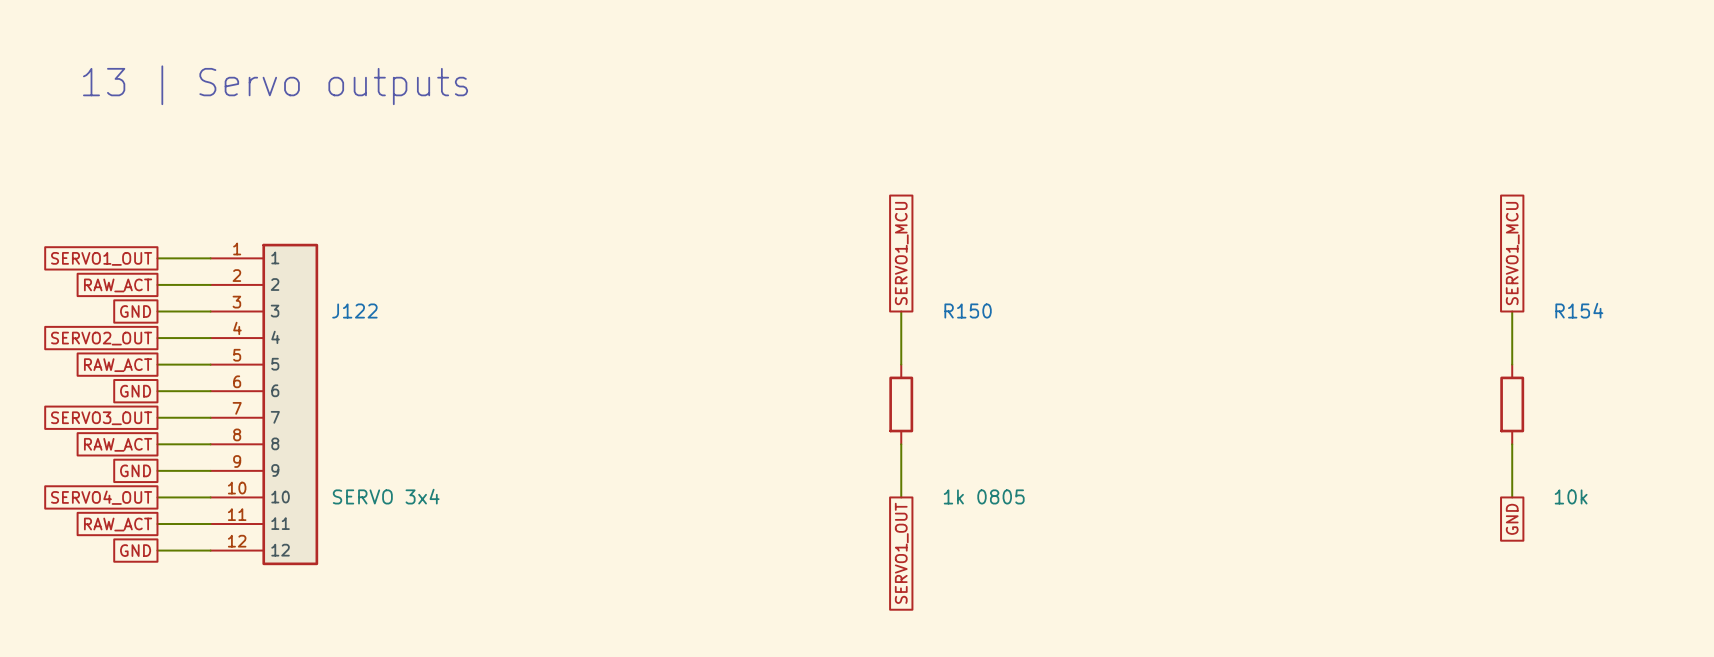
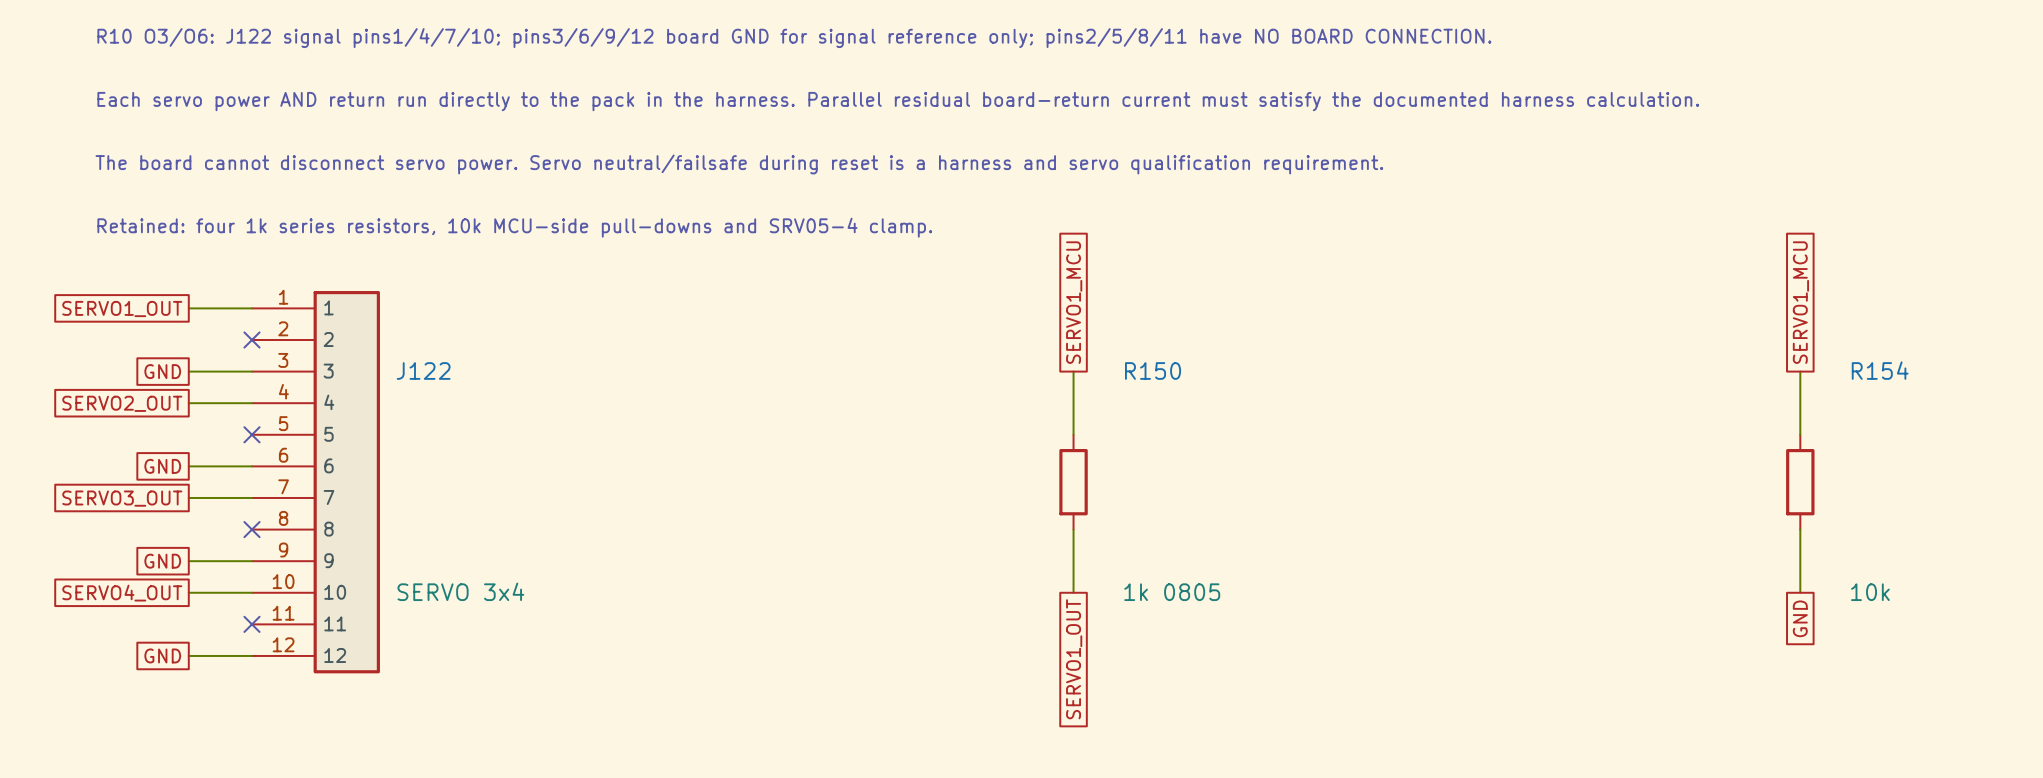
text: none -> R10 O3/O6: J122 signal pins1/4/7/10; pins3/6/9/12 board GND for signal reference only; pins2/5/8/11 have NO BOARD CONNECTION. (794, 38)
text: 13 | Servo outputs (275, 85) -> Each servo power AND return run directly to the pack in the harness. Parallel residual board-return current must satisfy the documented harness calculation. (898, 101)
text: none -> The board cannot disconnect servo power. Servo neutral/failsafe during reset is a harness and servo qualification requirement. (739, 164)
text: none -> Retained: four 1k series resistors, 10k MCU-side pull-downs and SRV05-4 clamp. (514, 227)
wire: (157, 284) (210, 284) -> none
no-connect mark: none -> (251, 339)
global label: RAW_ACT (118, 285) -> none
wire: (157, 364) (210, 364) -> none
no-connect mark: none -> (251, 434)
global label: RAW_ACT (118, 365) -> none
global label: RAW_ACT (118, 444) -> none
wire: (157, 444) (210, 444) -> none
no-connect mark: none -> (251, 529)
global label: RAW_ACT (118, 524) -> none
wire: (157, 524) (210, 524) -> none
no-connect mark: none -> (251, 624)

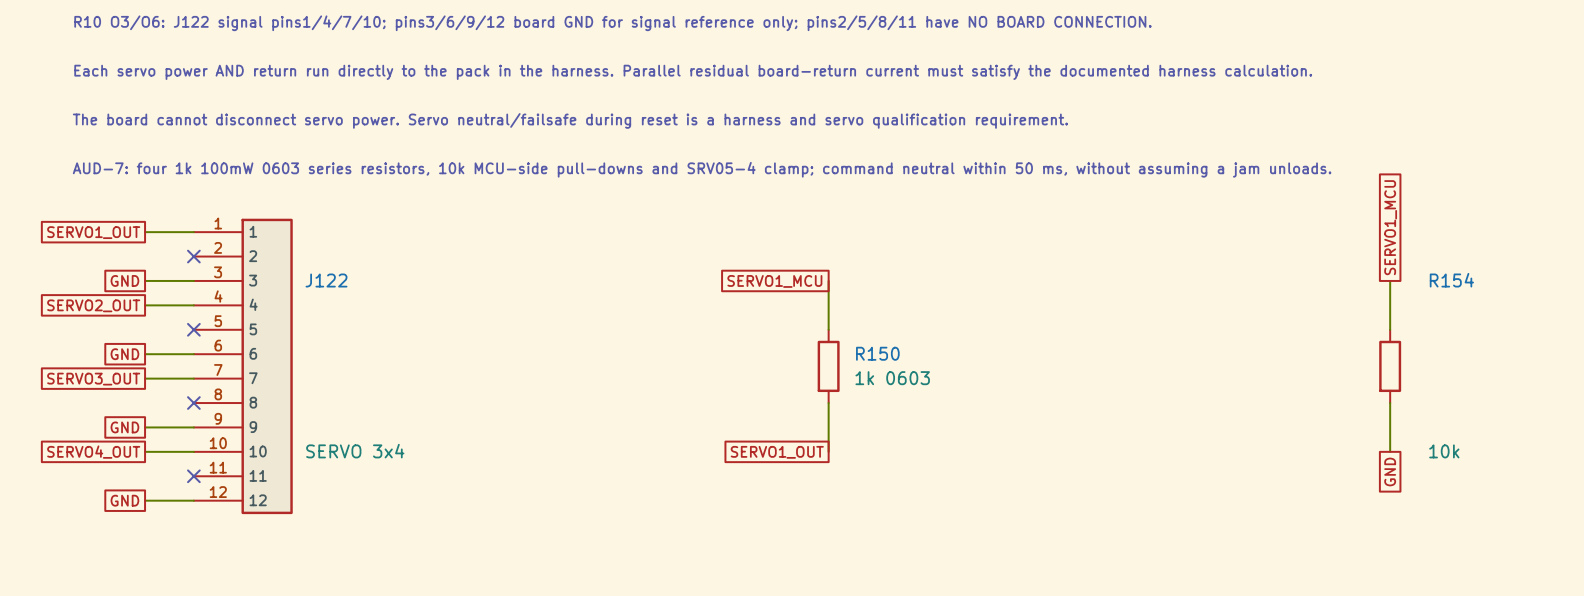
text: Retained: four 1k series resistors, 10k MCU-side pull-downs and SRV05-4 clamp. (514, 227) -> AUD-7: four 1k 100mW 0603 series resistors, 10k MCU-side pull-downs and SRV05-4 clamp; command neutral within 50 ms, without assuming a jam unloads. (702, 169)
global label rotation: 0° (1074, 302) -> 90° counterclockwise (774, 281)
R150 name position: R150 (1153, 371) -> R150 (877, 353)
R150 value: 1k 0805 (1172, 592) -> 1k 0603 (892, 378)
global label rotation: 0° (1074, 659) -> 90° clockwise (777, 452)

